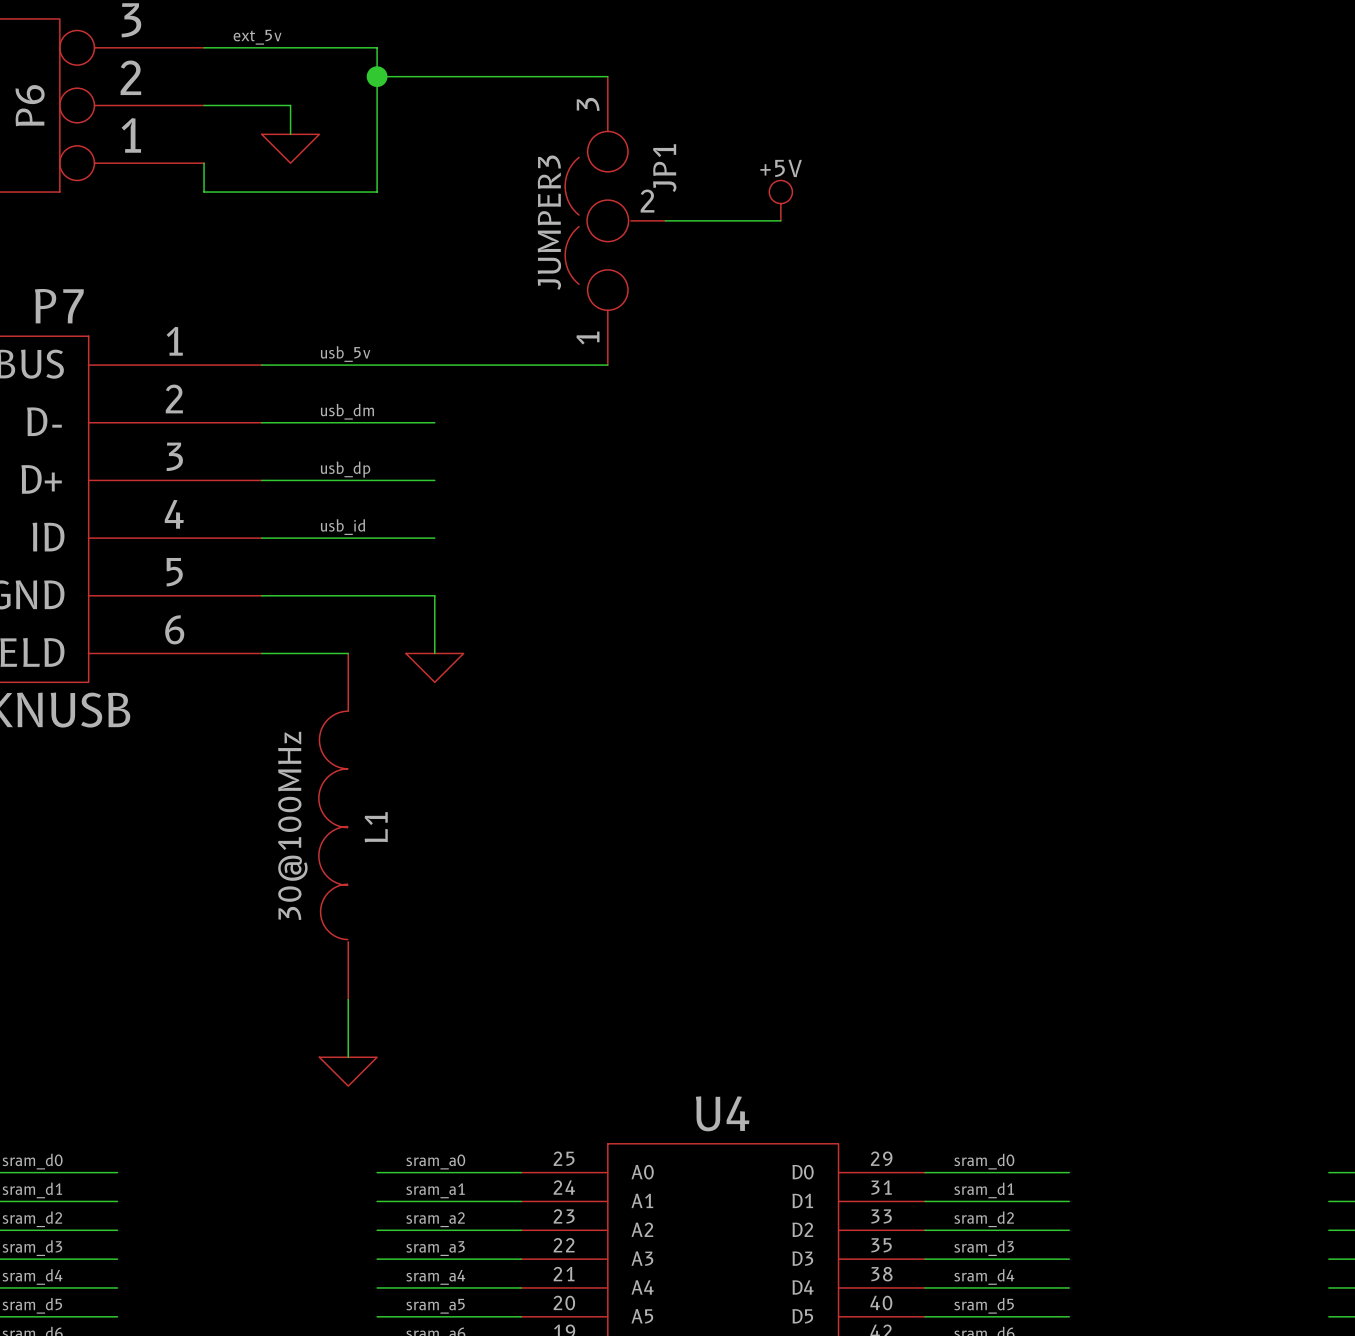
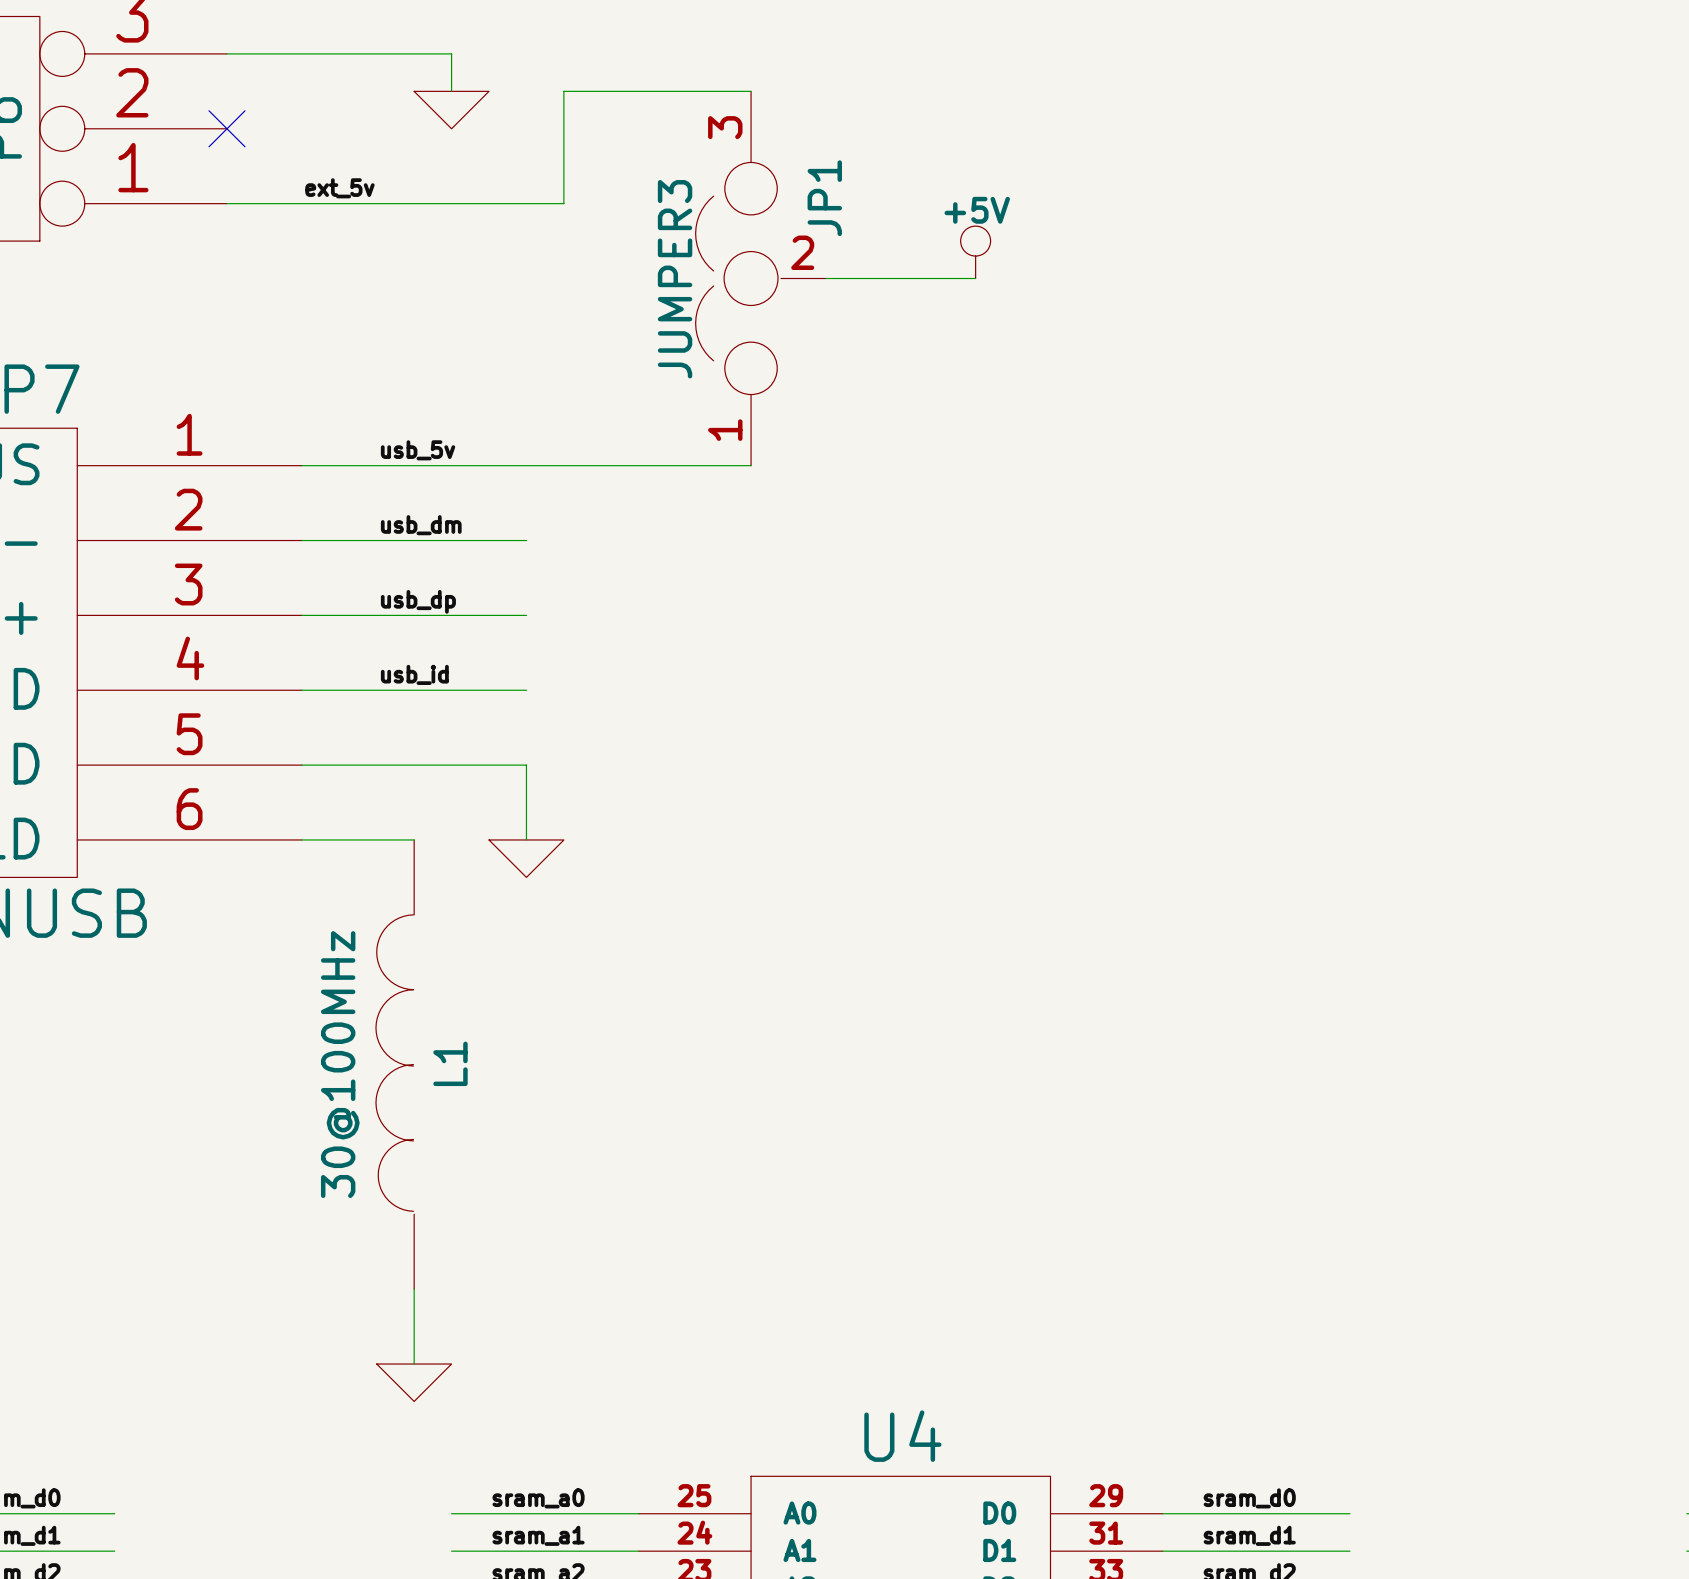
label position: ext_5v (257, 37) -> ext_5v (339, 188)
junction: (377, 76) -> none
wire: (463, 76) (377, 76) (377, 192) (204, 192) (204, 163) -> (563, 91) (563, 203) (227, 203)
wire: (204, 105) (290, 105) (290, 134) -> none
no-connect mark: none -> (227, 128)
power symbol position: (290, 148) -> (451, 110)

